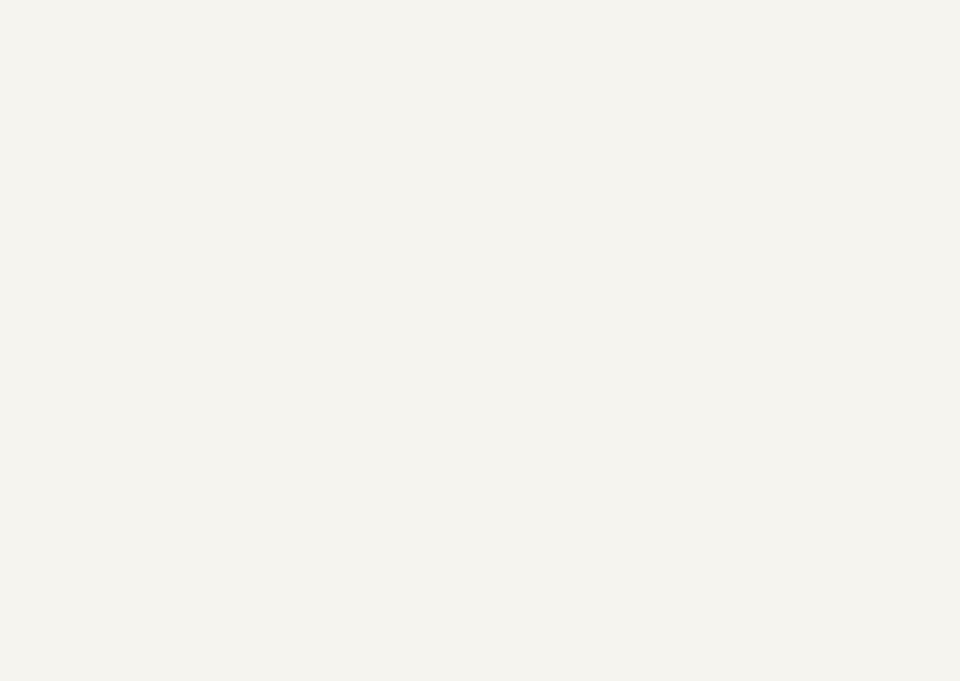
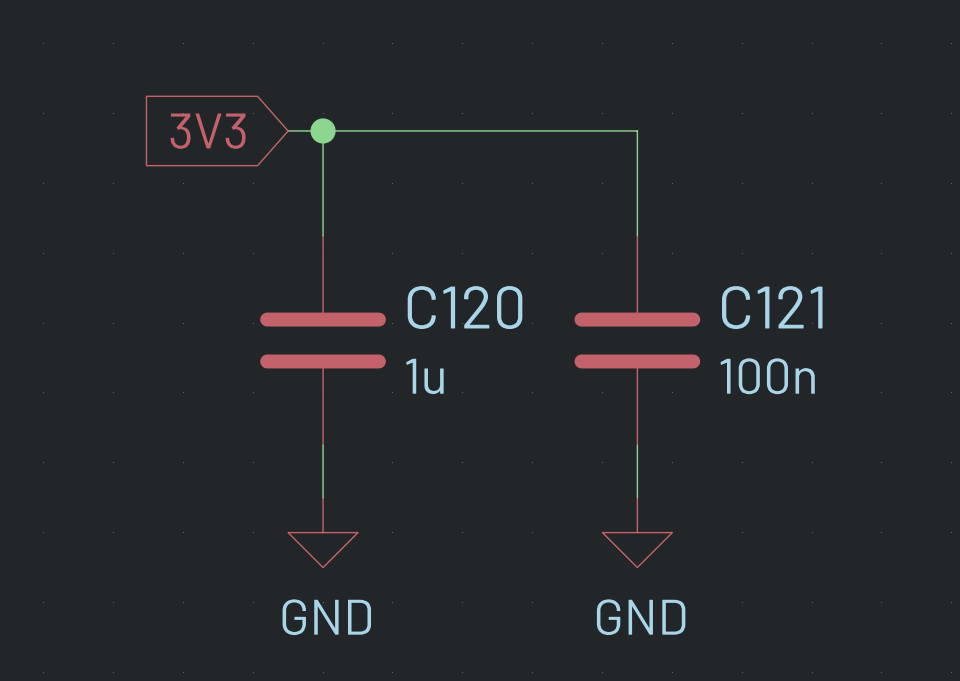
wire: none -> (288, 130) (637, 130) (637, 235)
wire: none -> (323, 130) (323, 235)
junction: none -> (323, 130)
global label: none -> 3V3 (208, 131)
C120: none -> (323, 340)
C121: none -> (637, 340)
wire: none -> (323, 445) (323, 497)
wire: none -> (637, 445) (637, 497)
power symbol: none -> GND (323, 532)
power symbol: none -> GND (637, 532)

